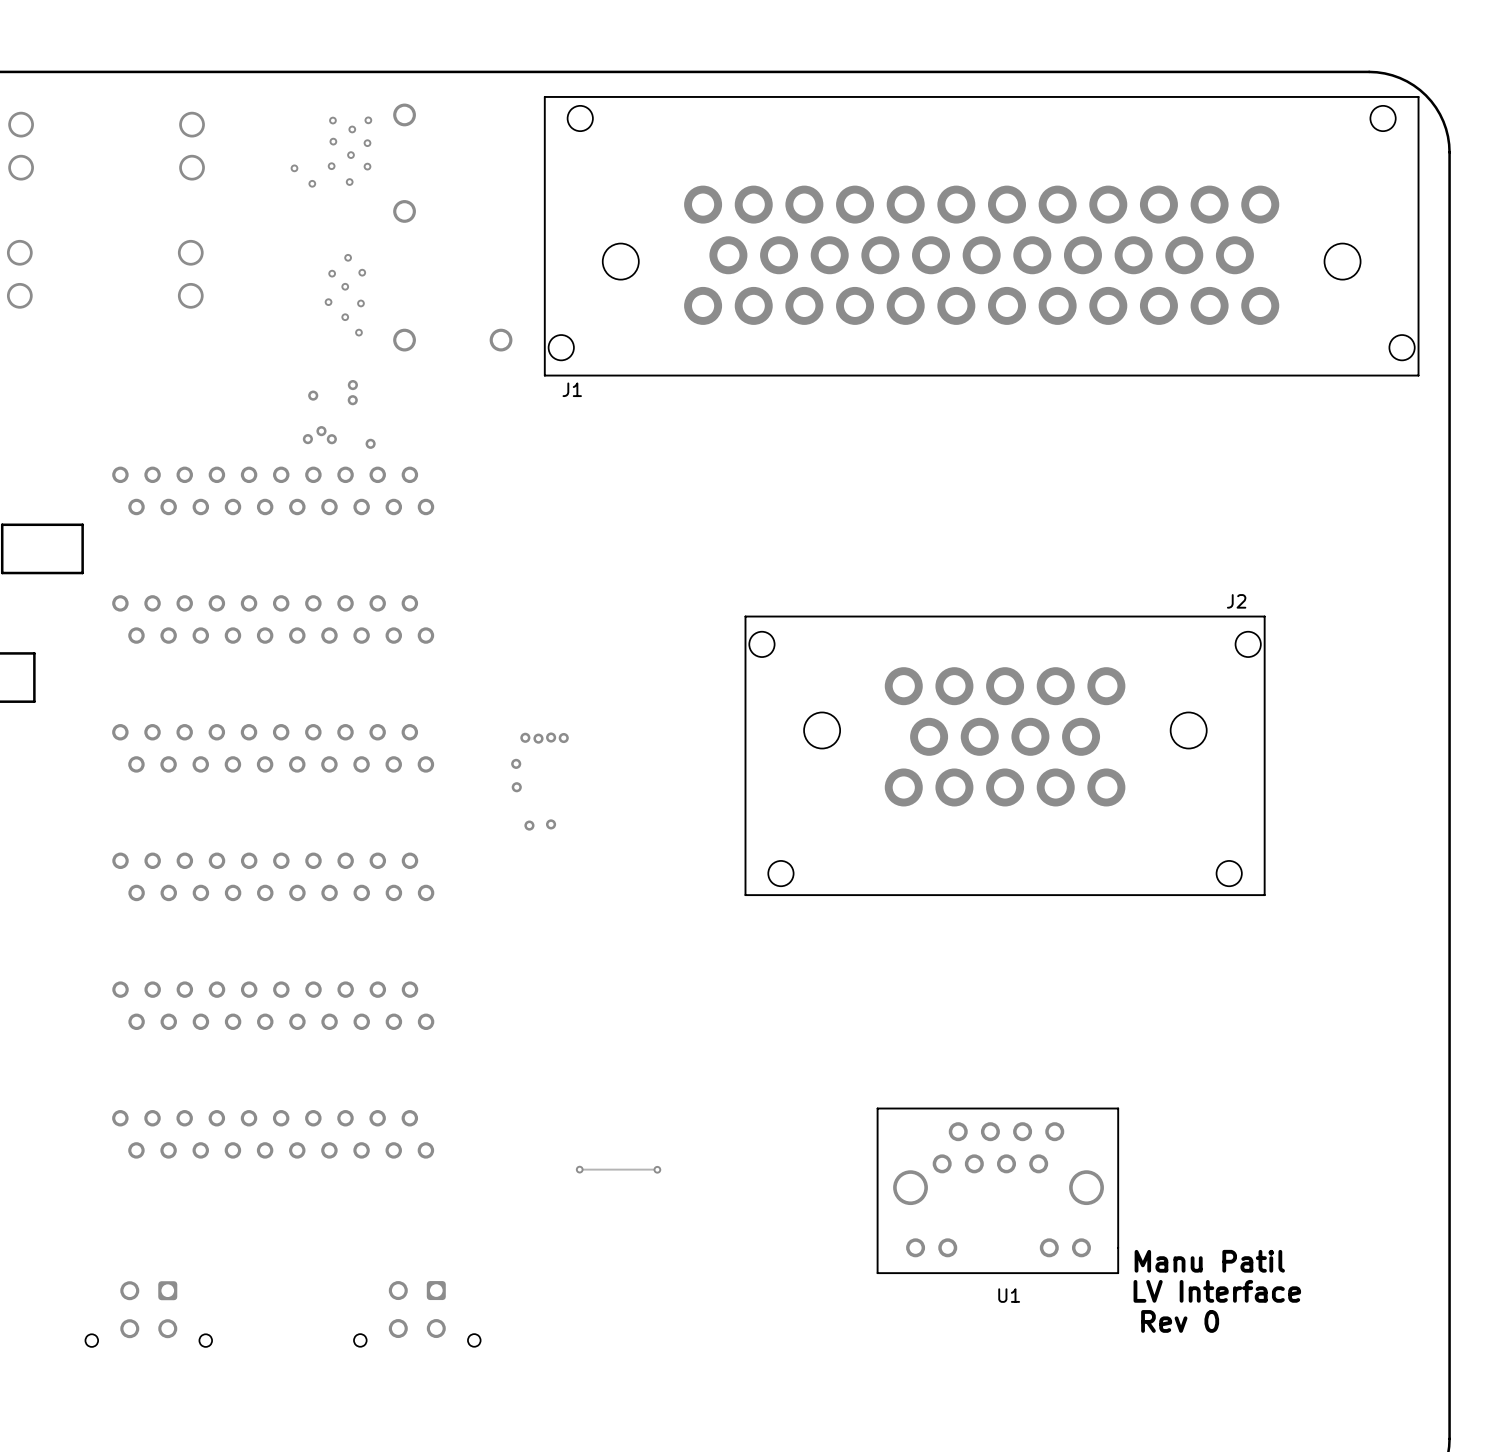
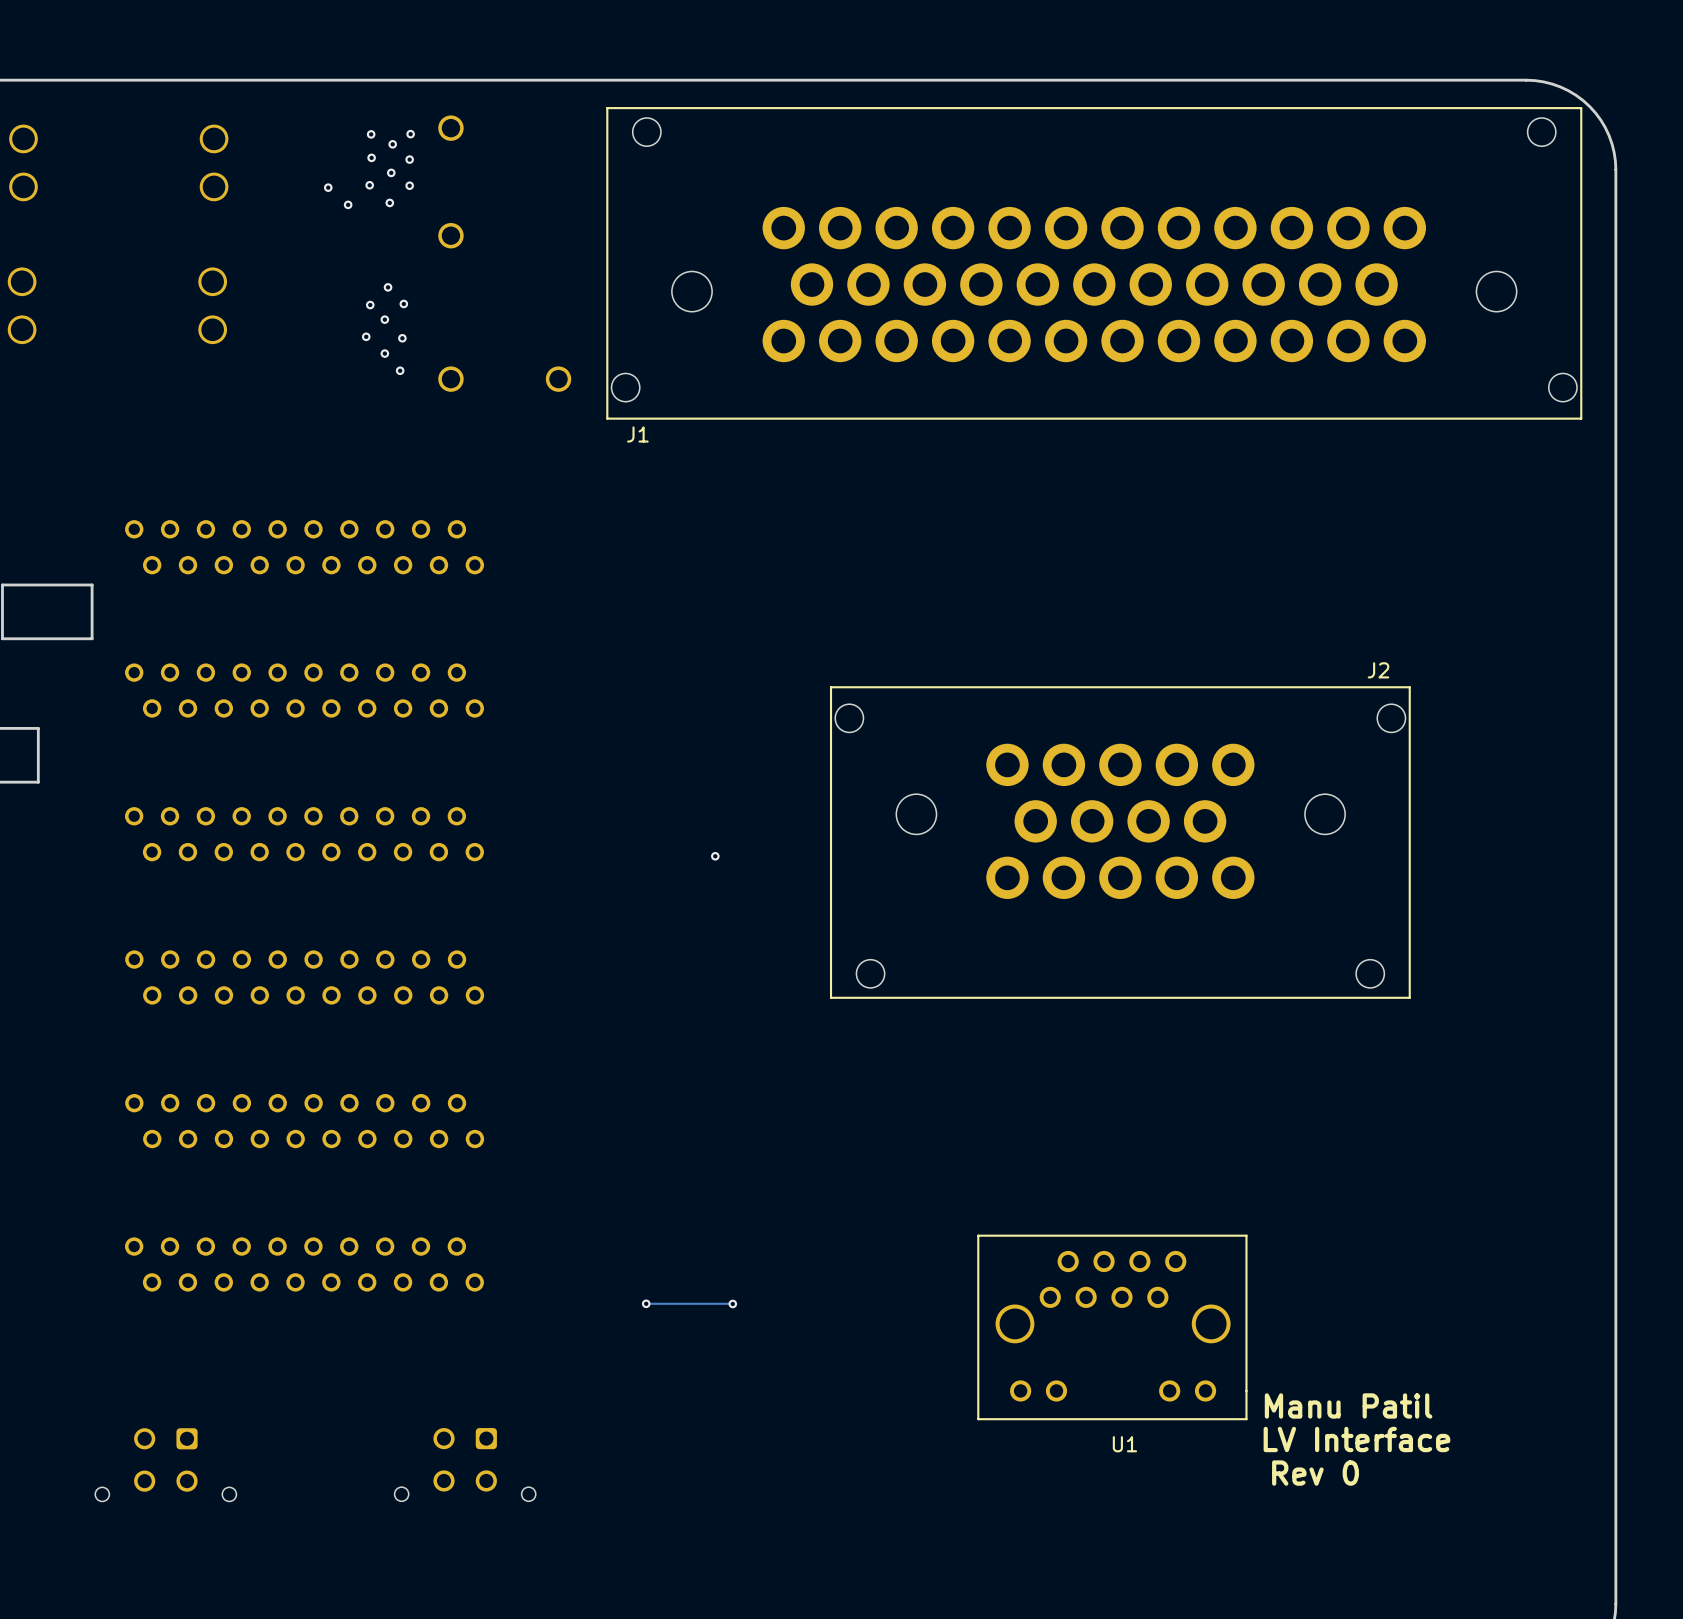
via: (352, 385) -> none
via: (313, 395) -> none
via: (352, 400) -> none
via: (321, 431) -> none
via: (307, 439) -> none
via: (331, 439) -> none
via: (370, 443) -> none
via: (525, 737) -> none
via: (551, 737) -> none
via: (538, 738) -> none
via: (563, 738) -> none
via: (516, 763) -> none
via: none -> (715, 856)
via: (516, 787) -> none
via: (551, 824) -> none
via: (529, 825) -> none

